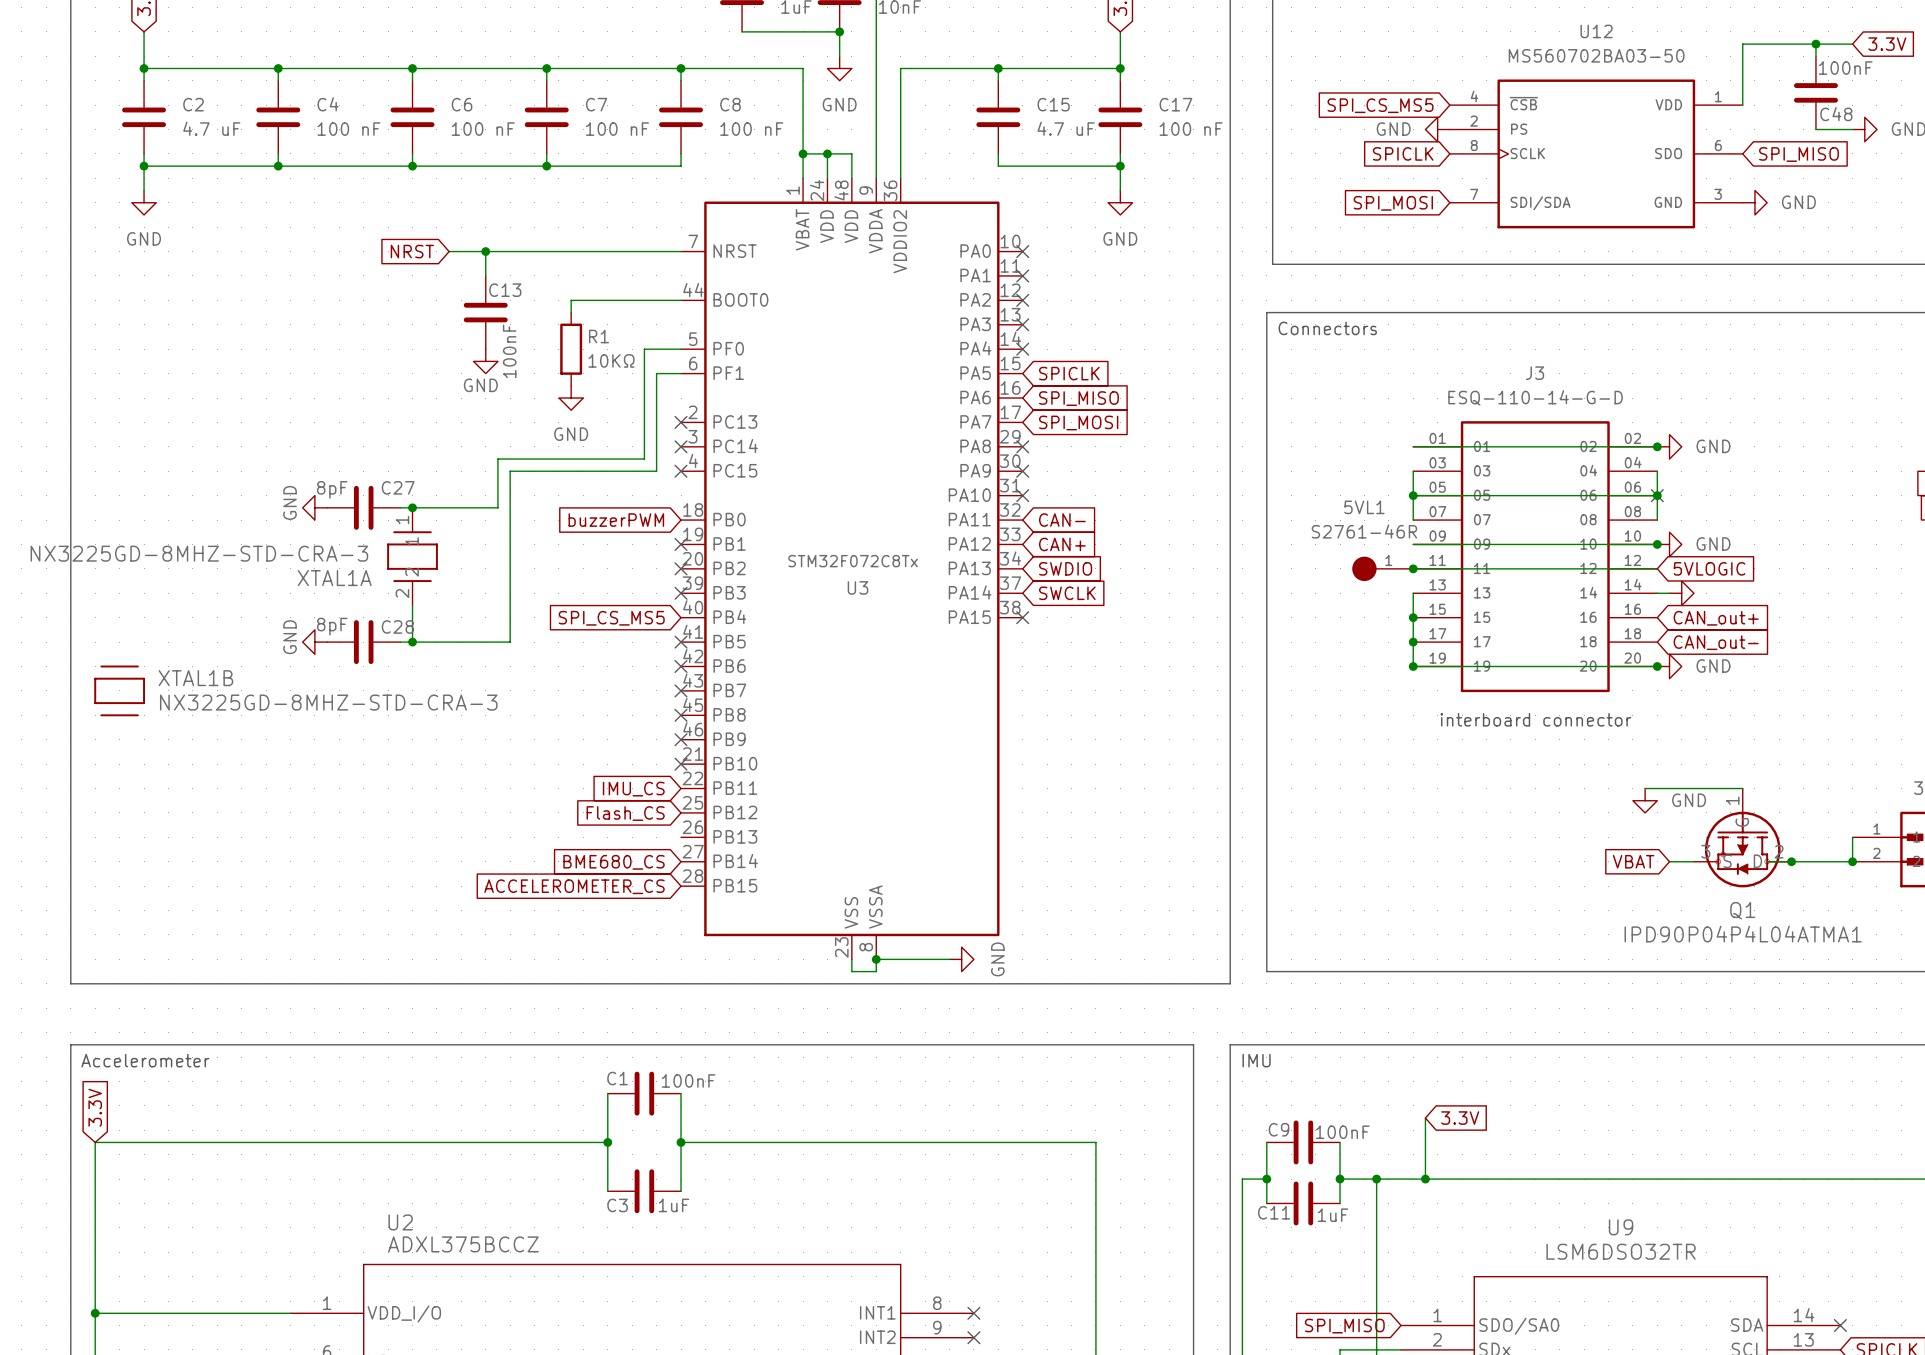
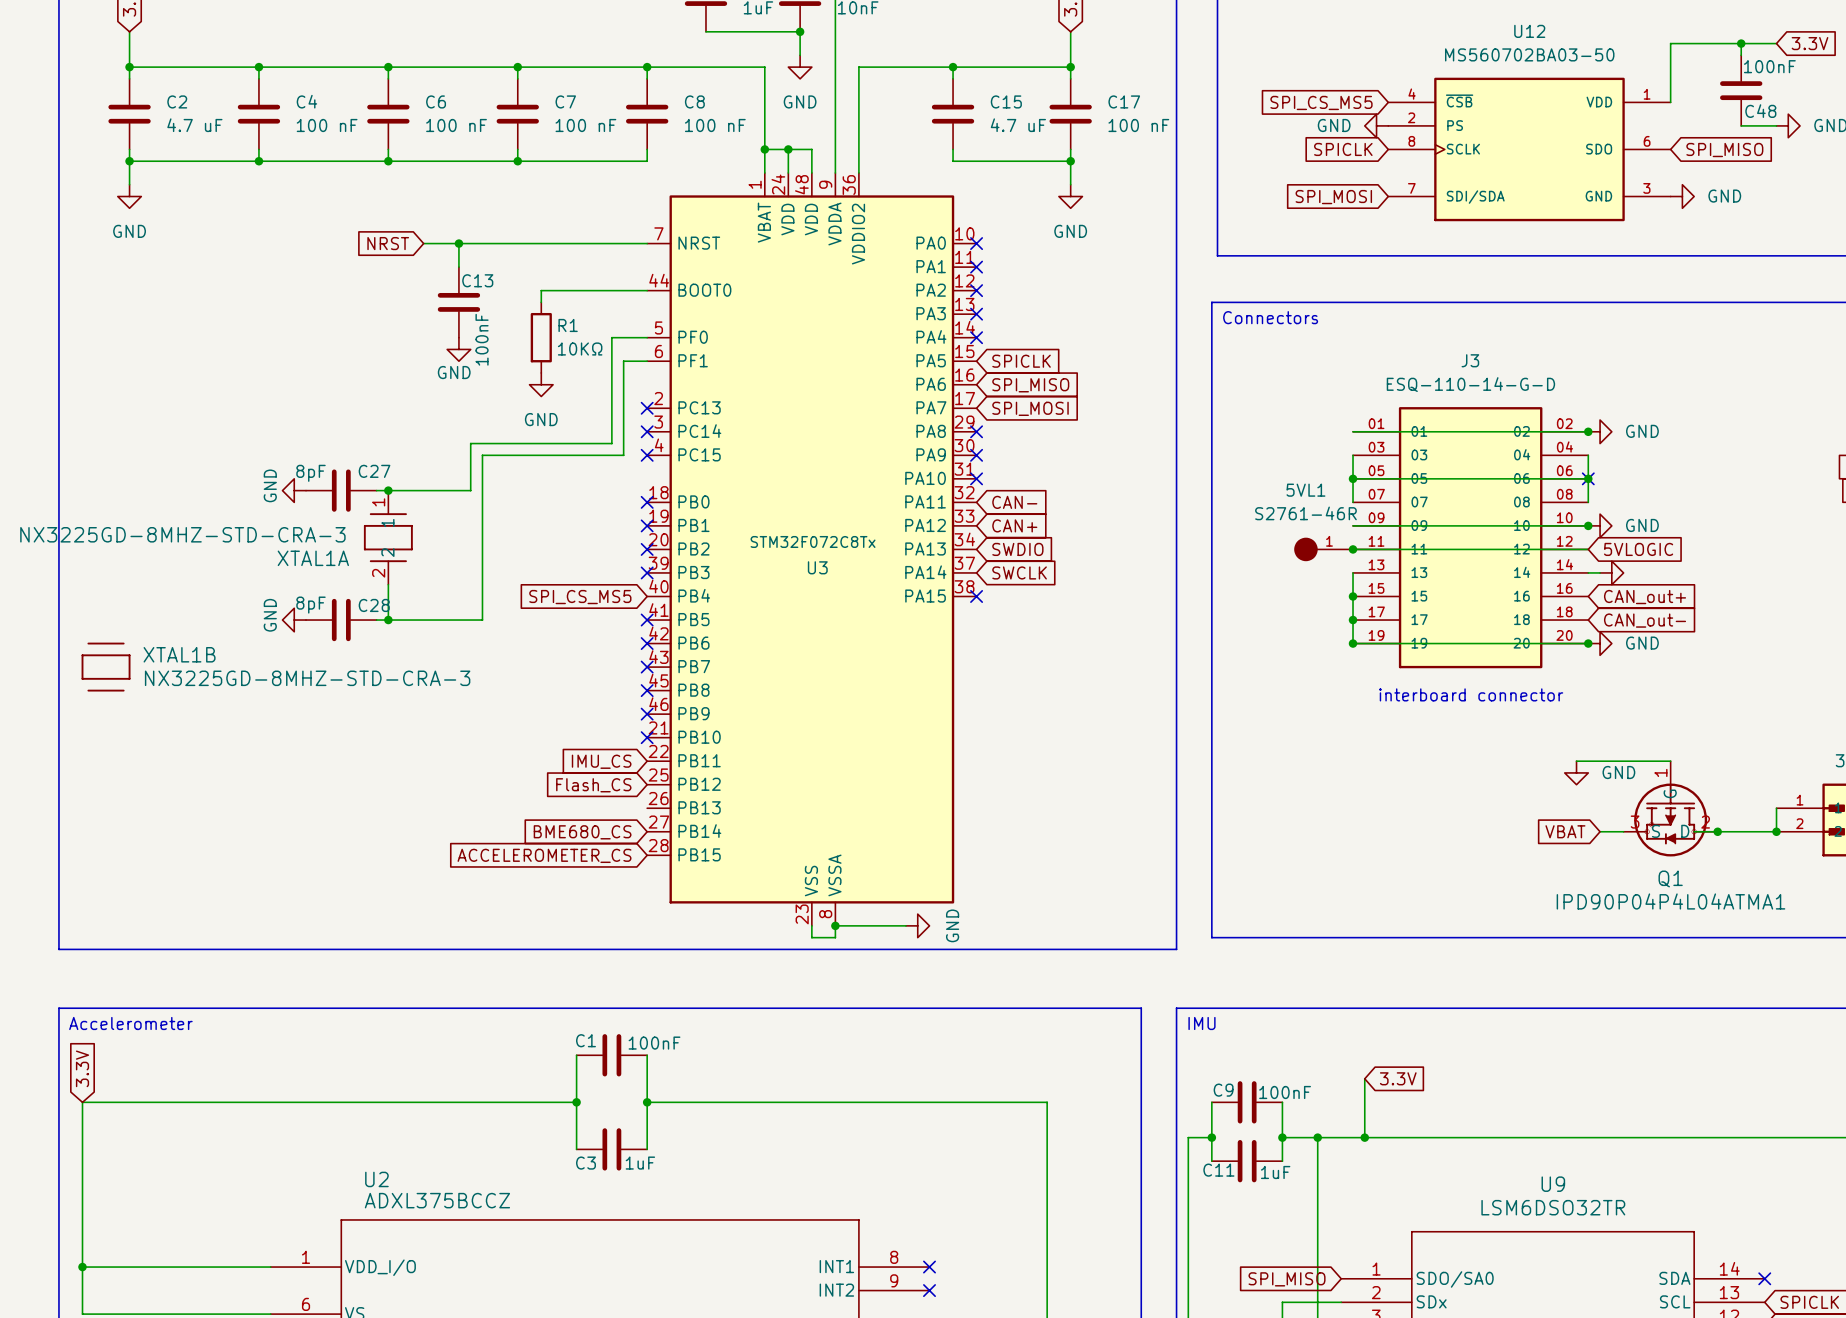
global label: buzzerPWM (616, 520) -> none
no-connect mark: none -> (647, 502)

